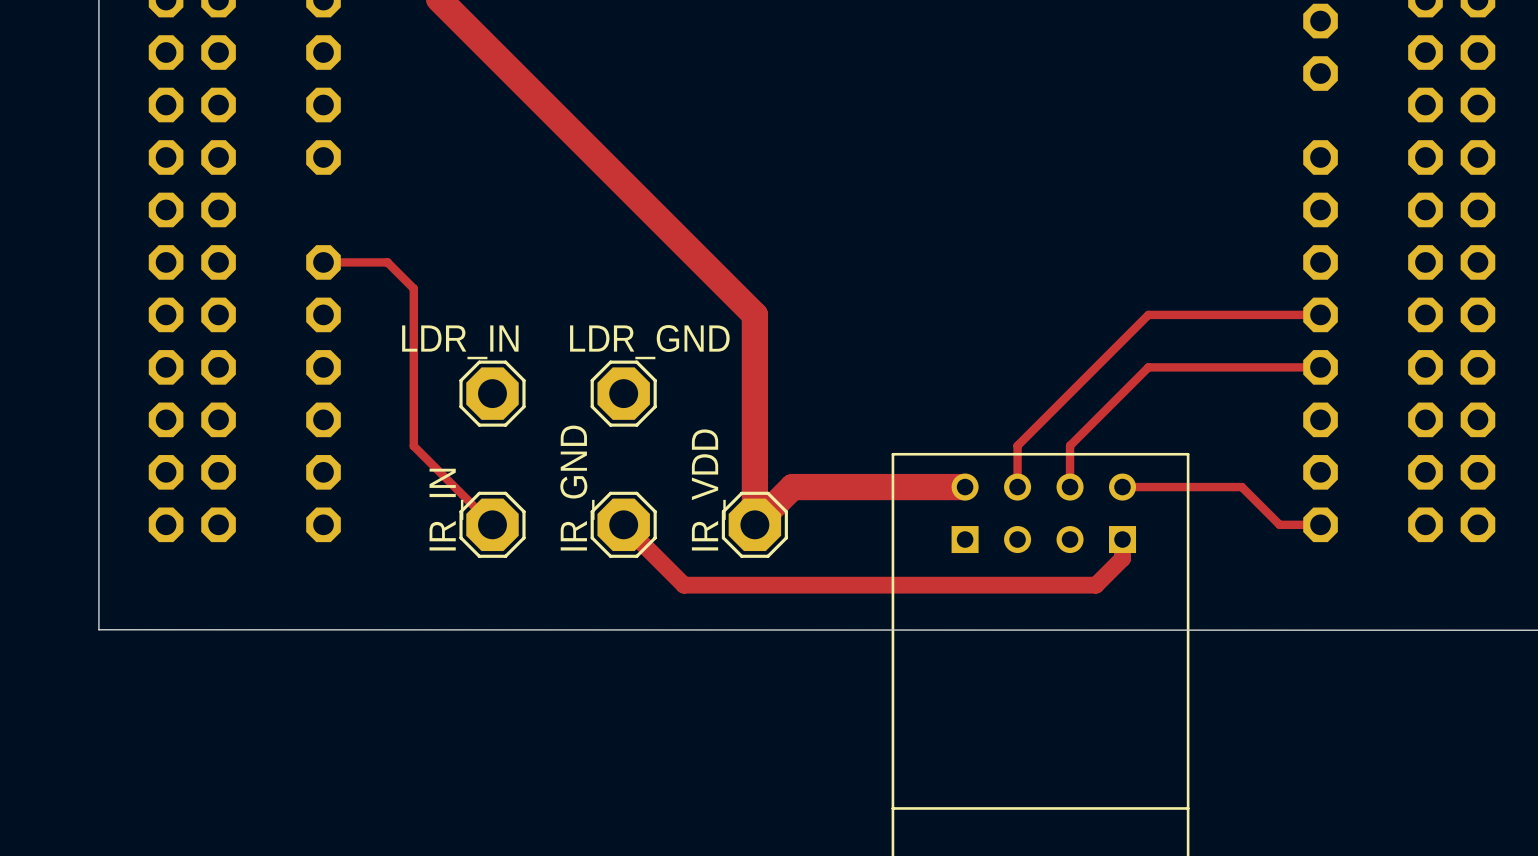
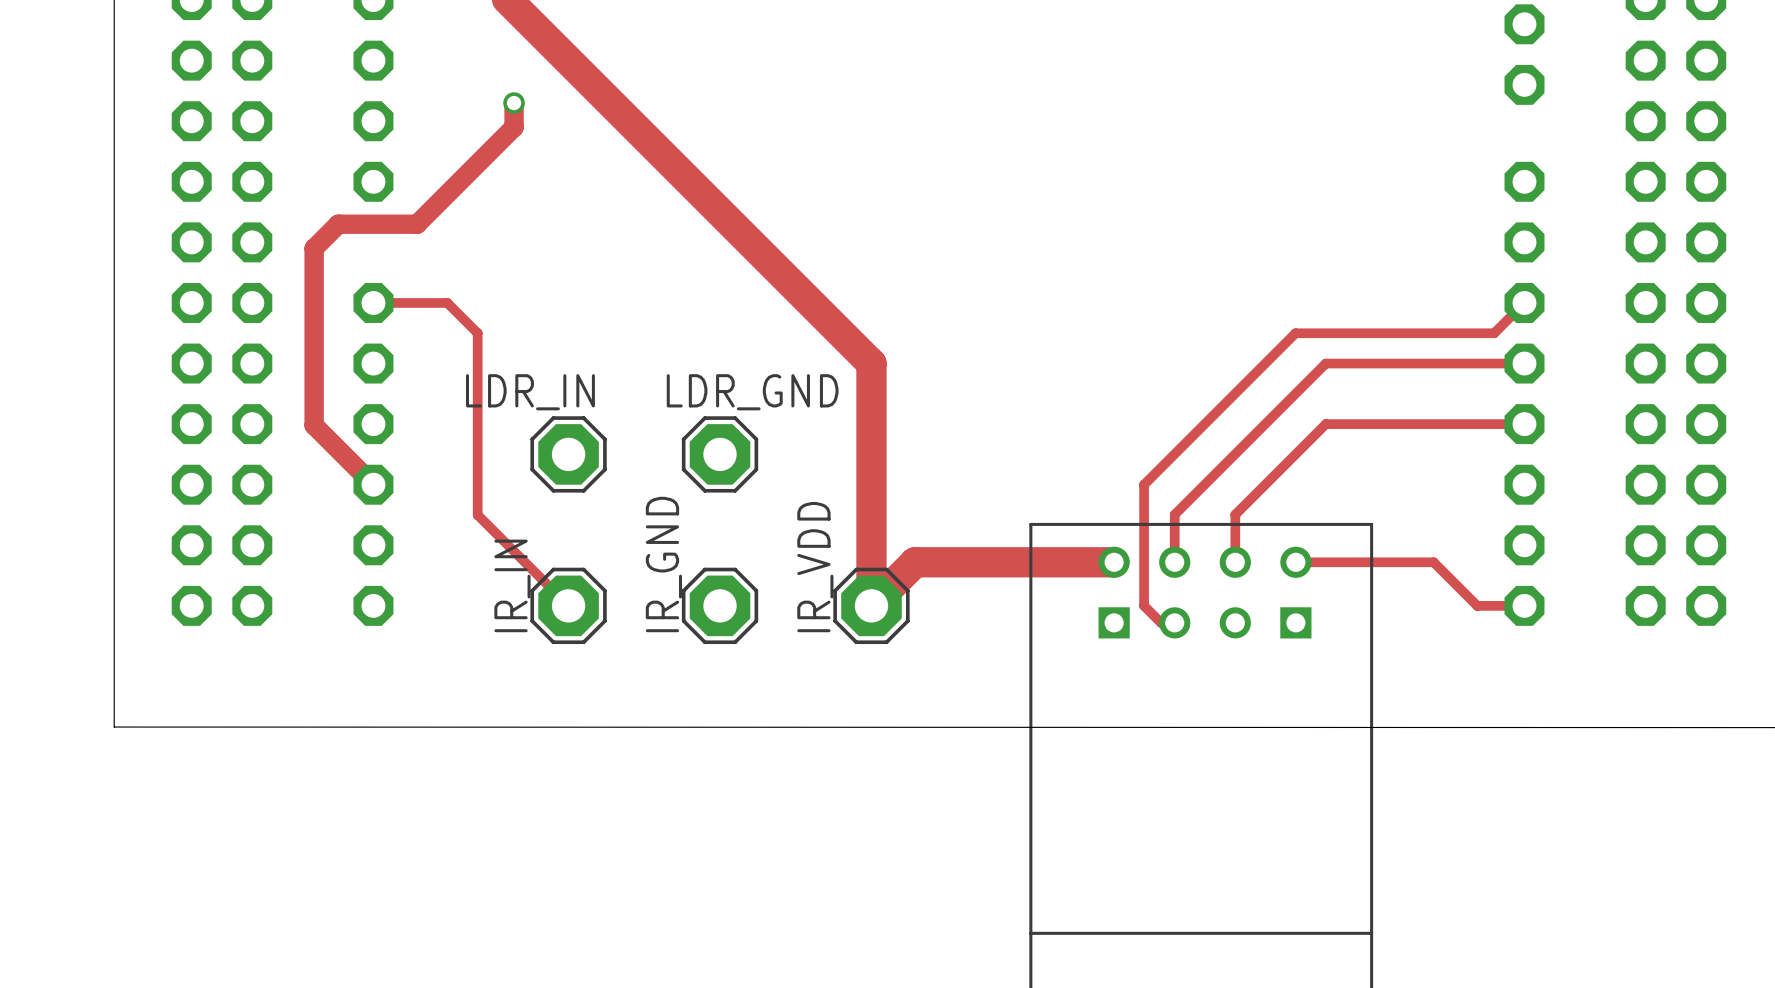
track: none -> (514, 103) (514, 127) (417, 224) (338, 224) (314, 248) (314, 425) (373, 484)
via: none -> (514, 103)
track: none -> (1524, 302) (1494, 333) (1295, 333) (1144, 484) (1144, 605) (1161, 622) (1174, 622)
track: (623, 524) (684, 585) (1095, 585) (1122, 558) (1122, 539) -> none

